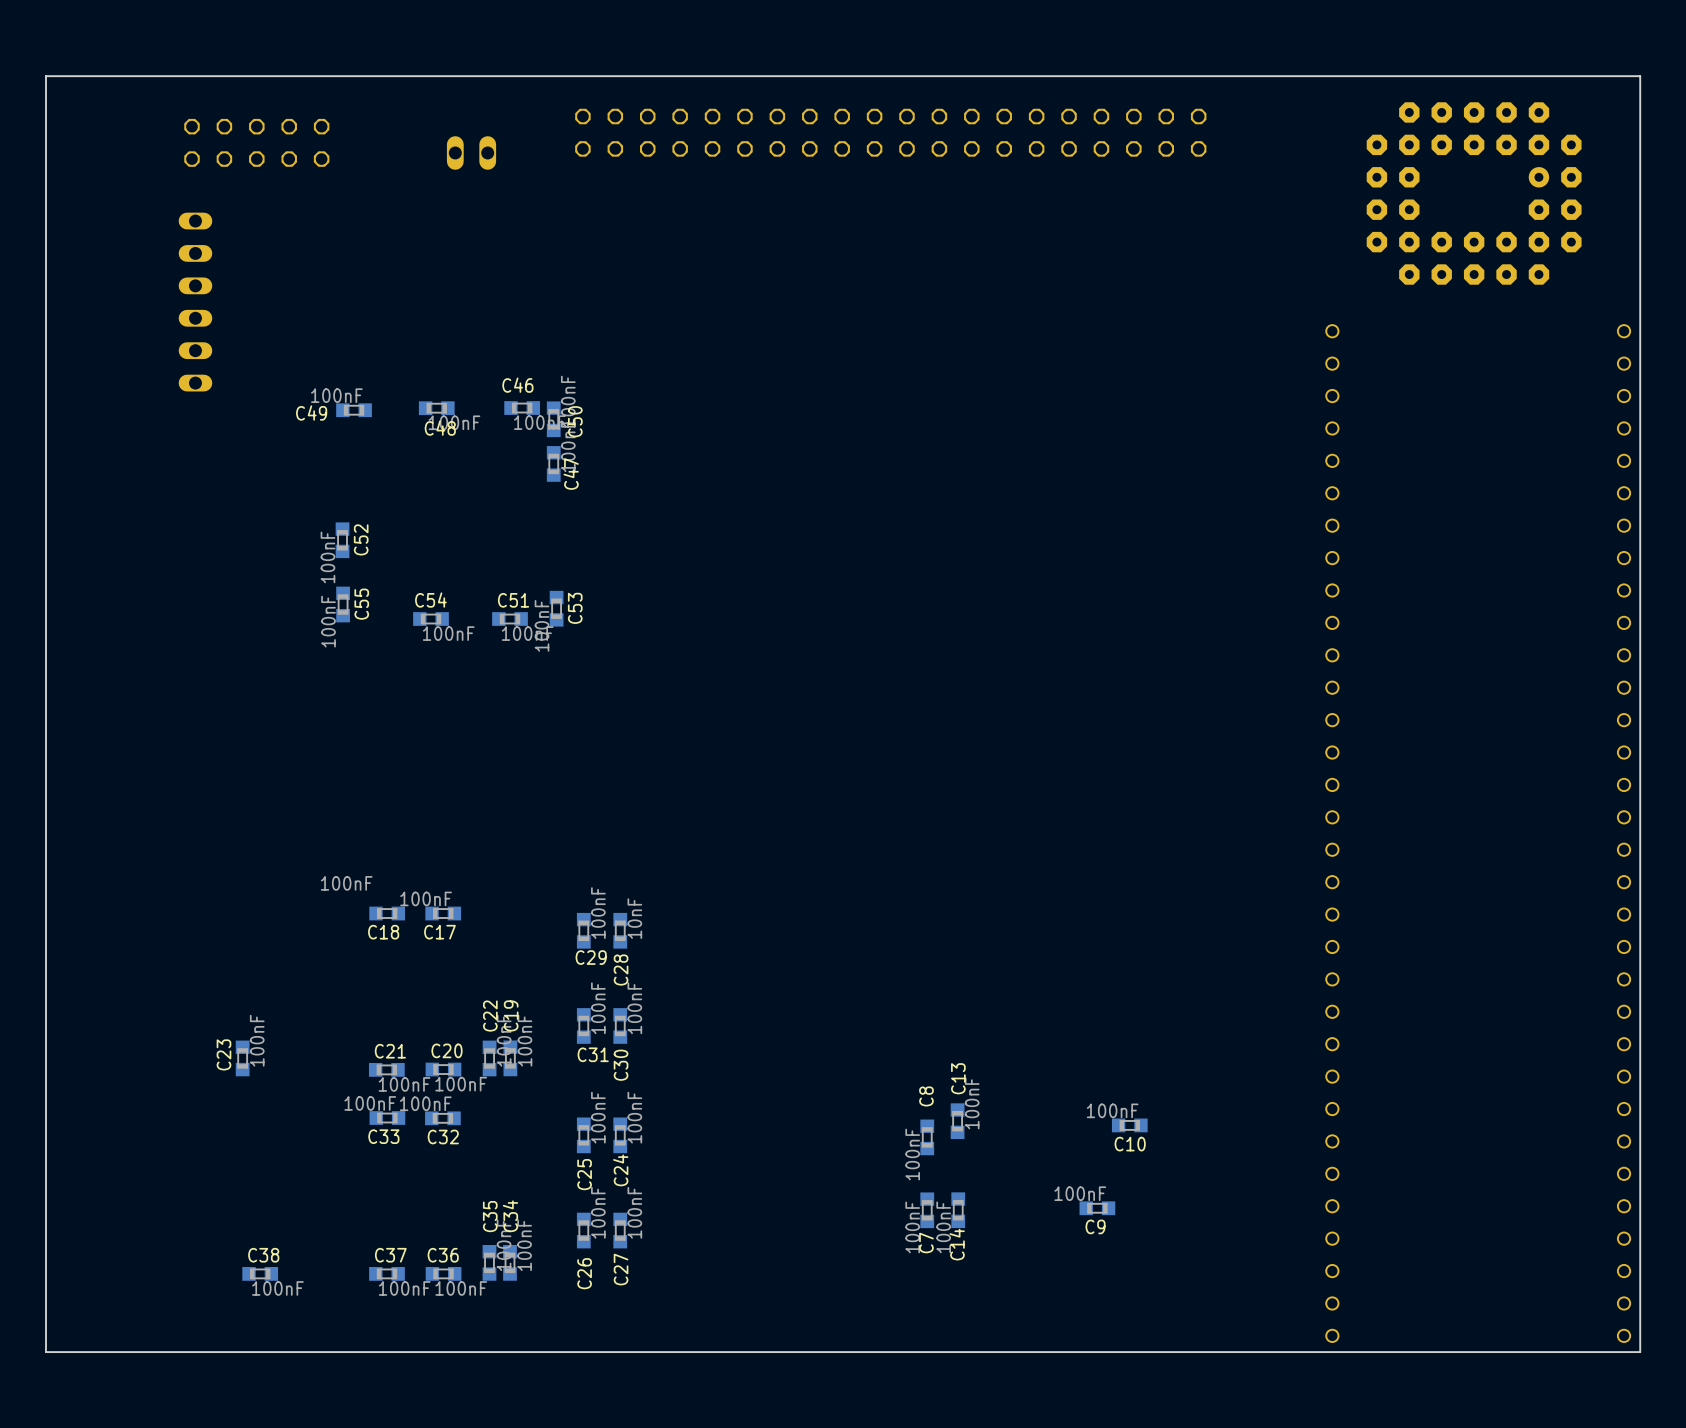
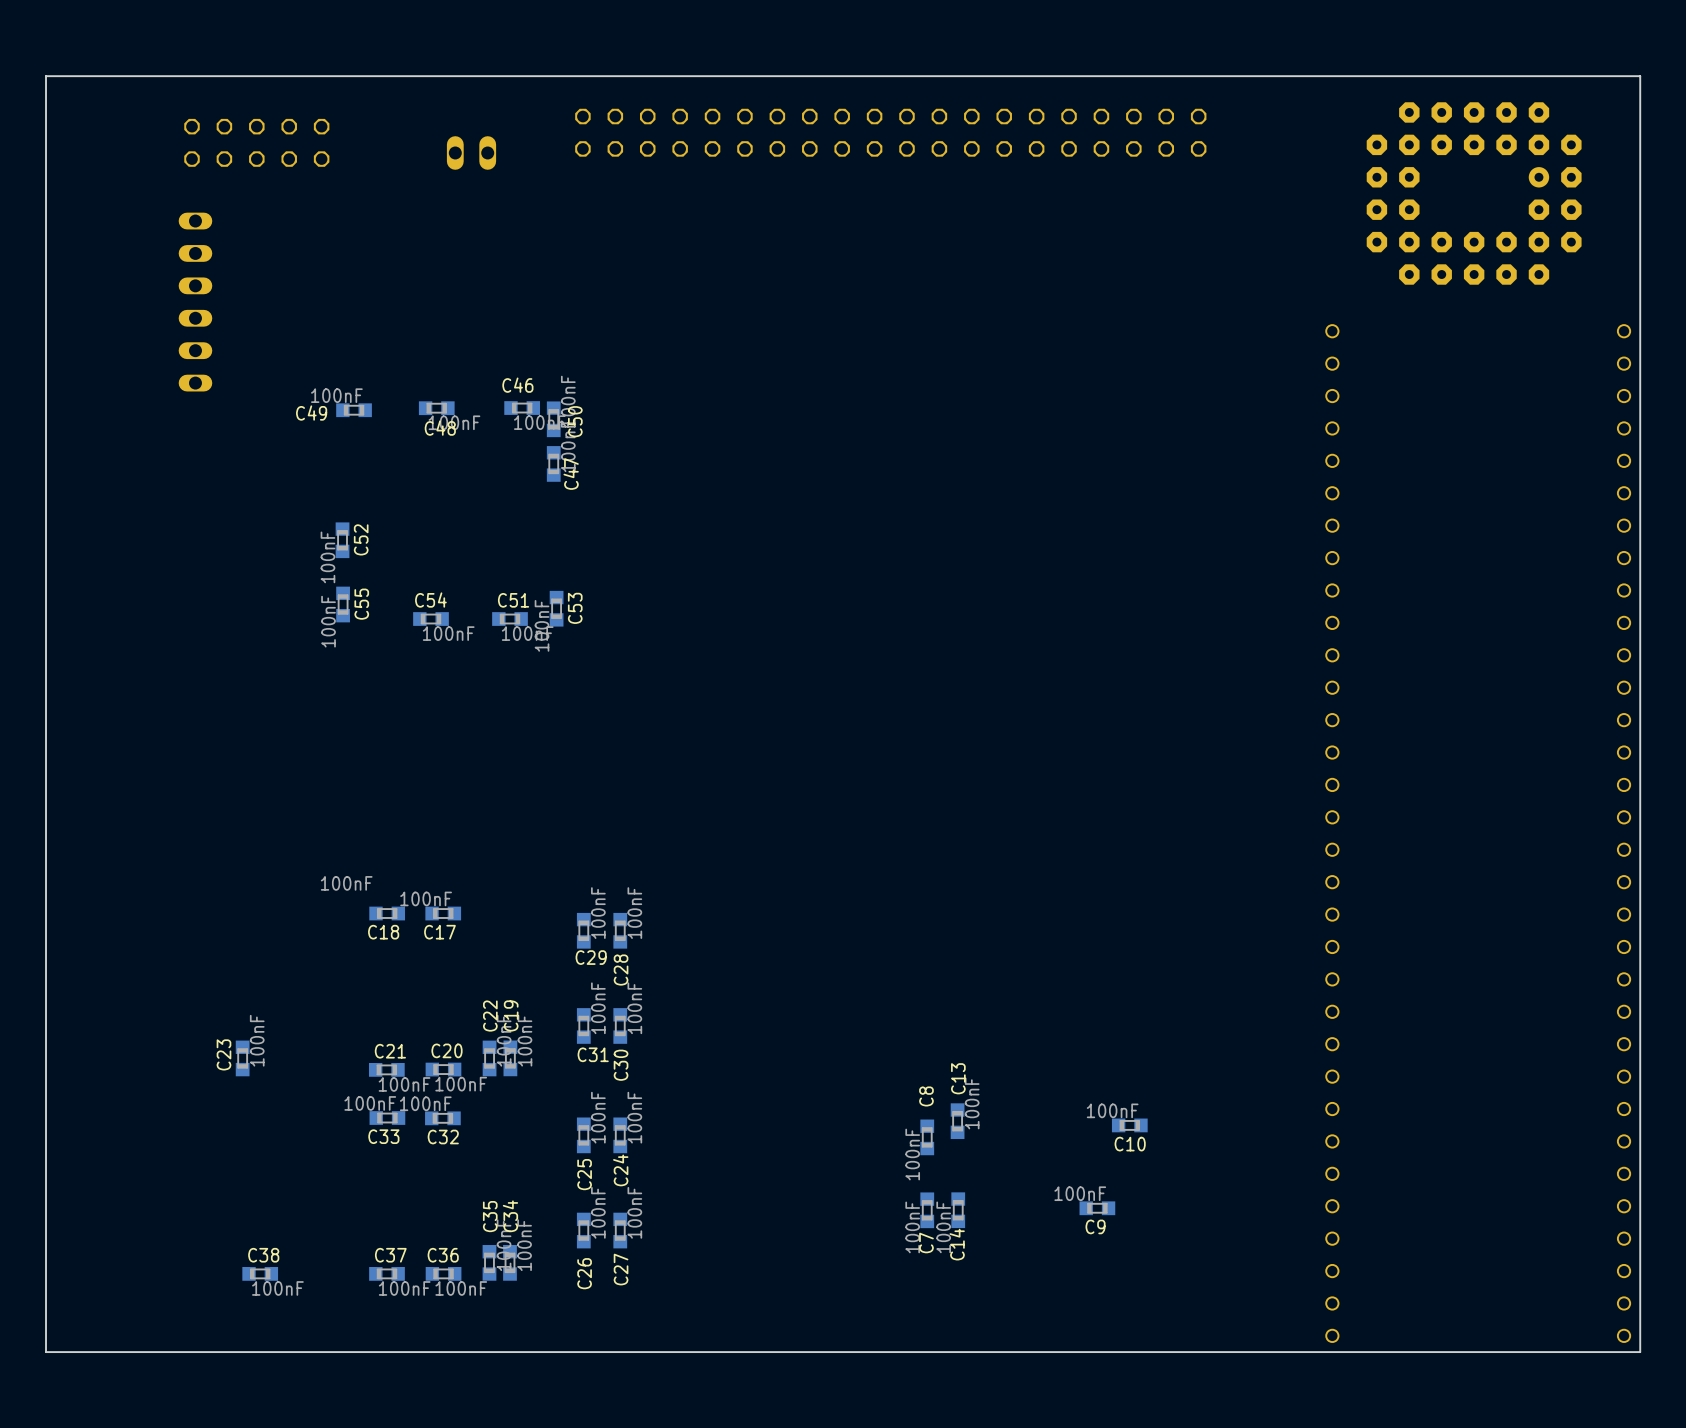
C28 value: 10nF (634, 918) -> 100nF (634, 913)

